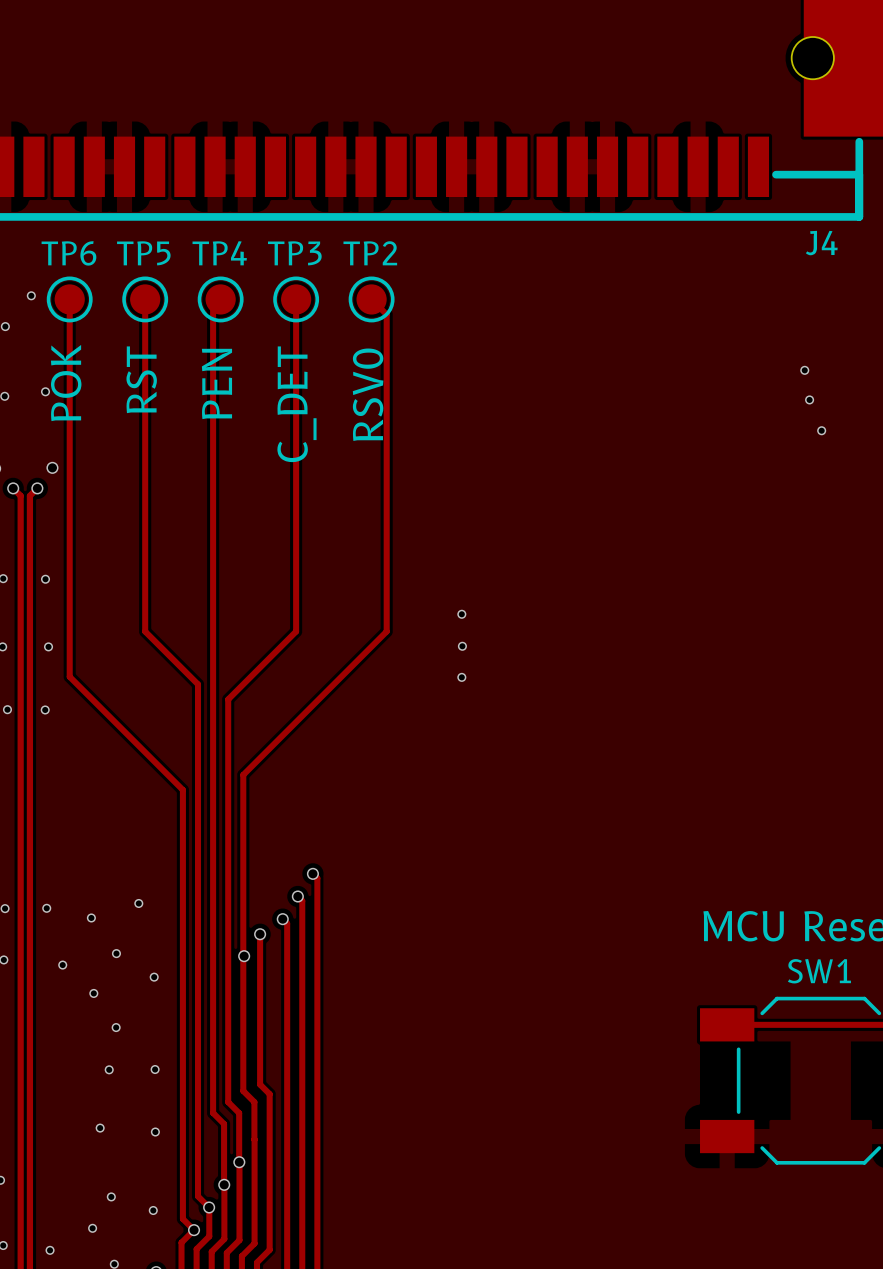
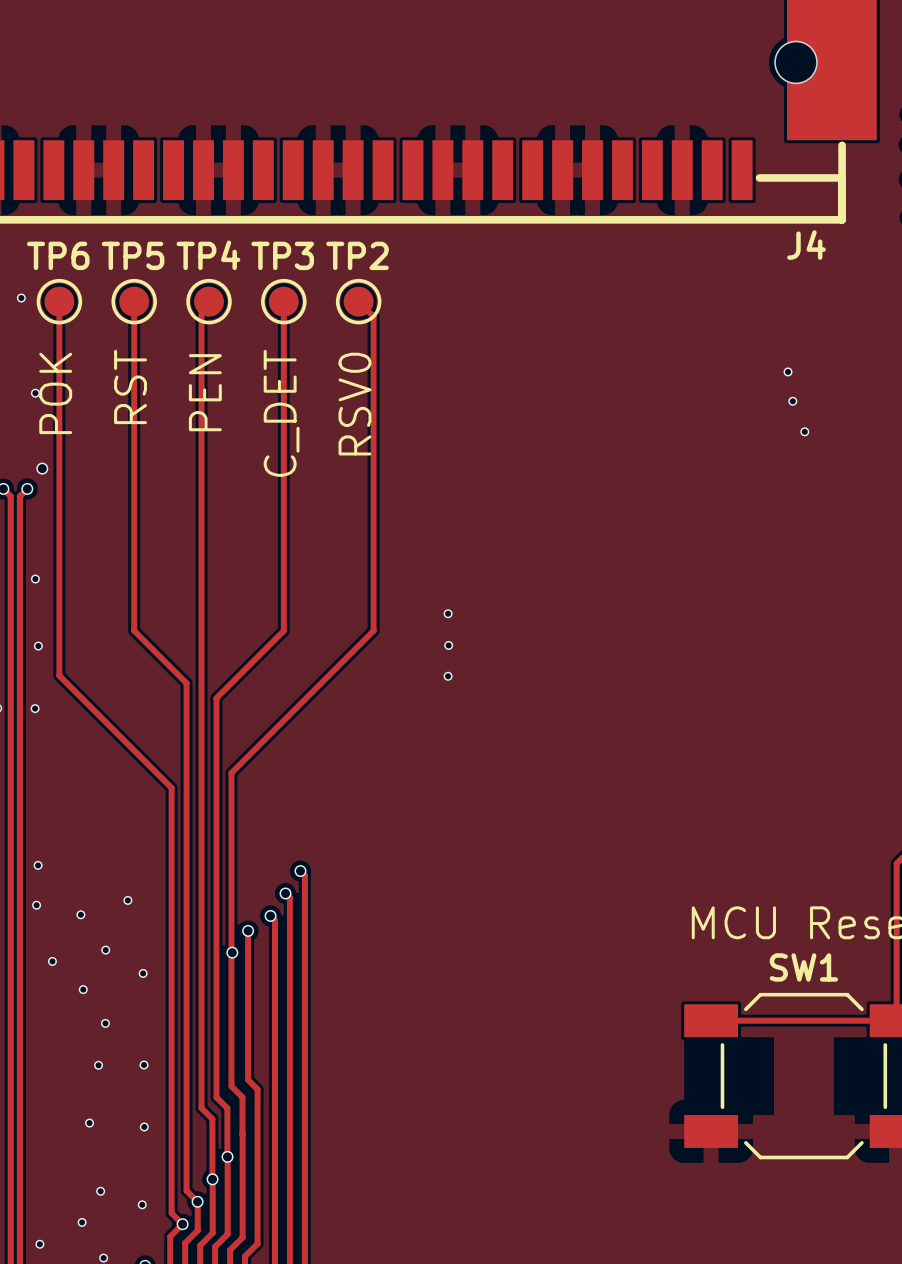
via: none -> (38, 865)

